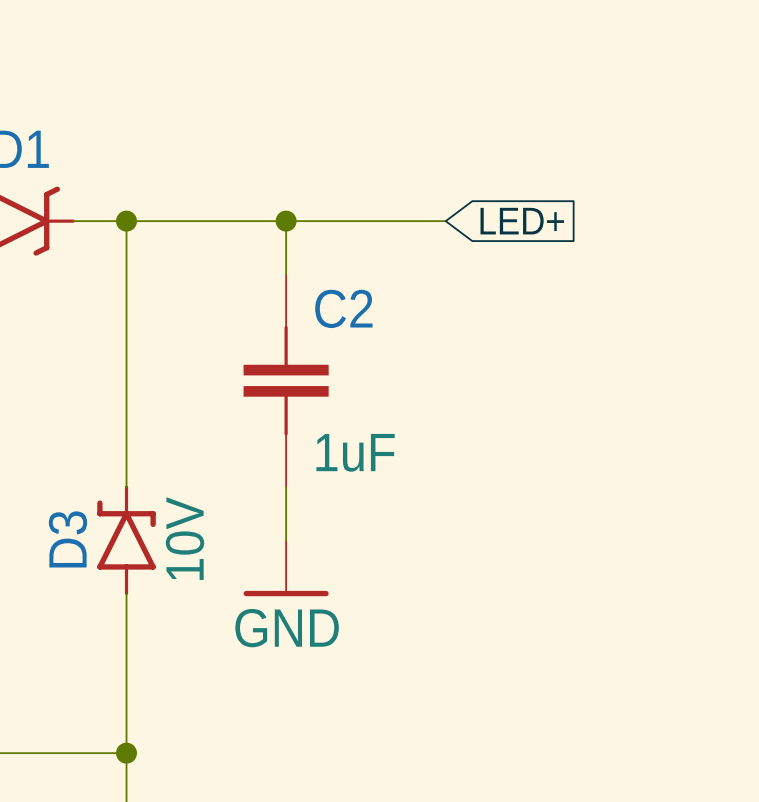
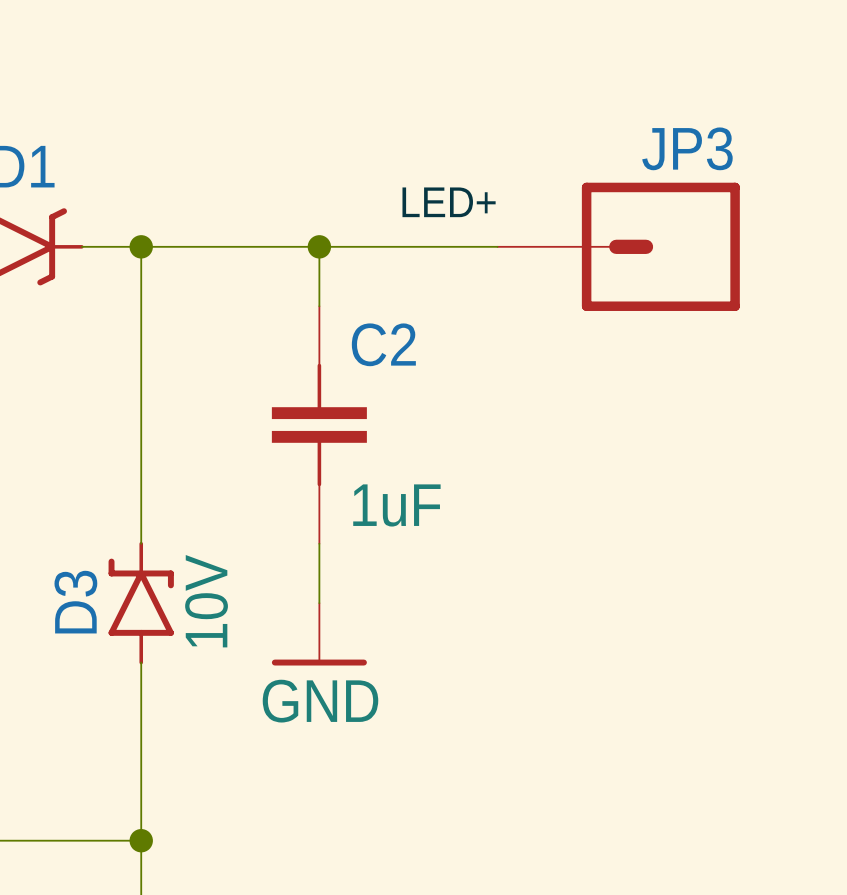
label: none -> LED+ (449, 202)
global label: LED+ (522, 221) -> none
JP3: none -> (618, 246)

